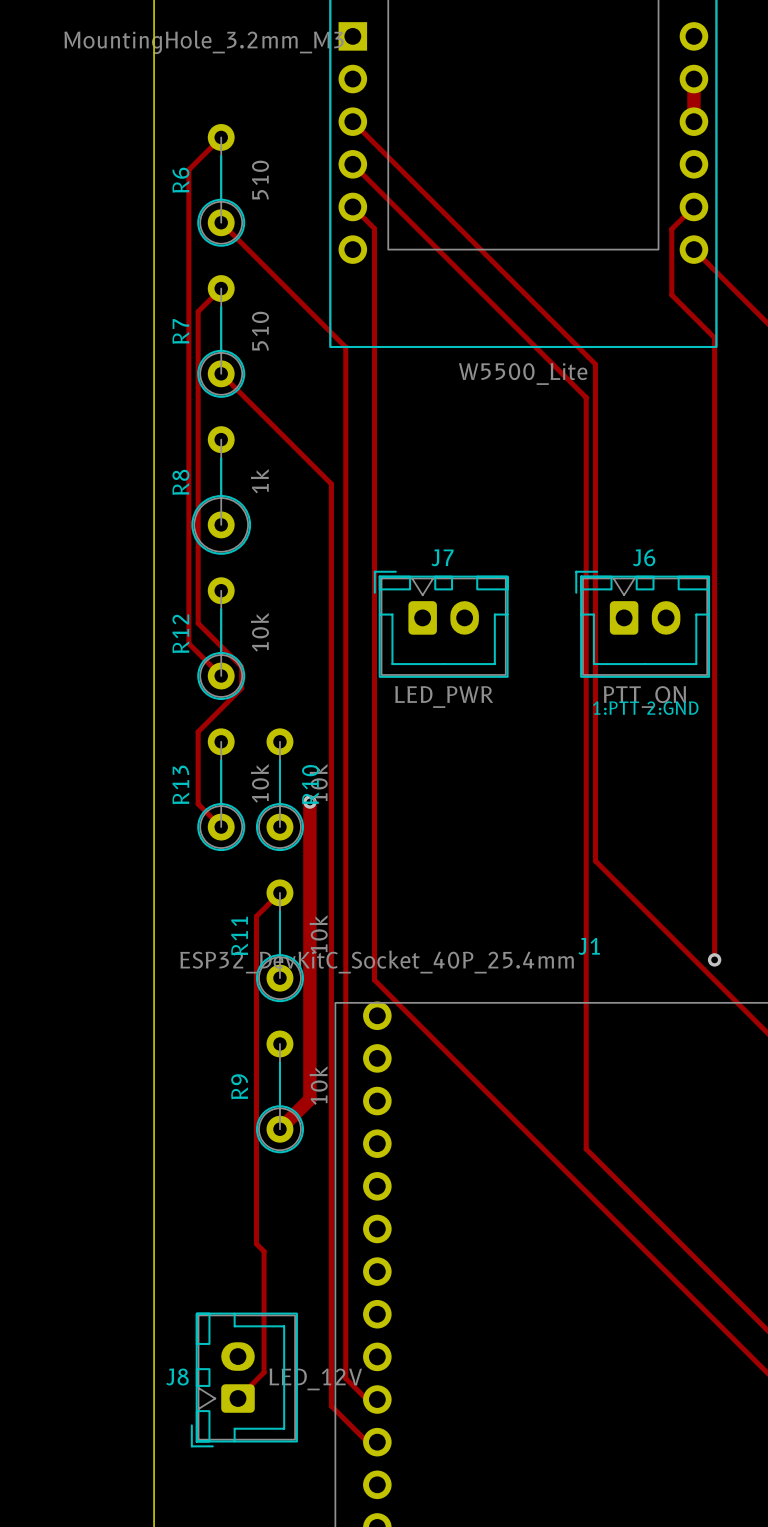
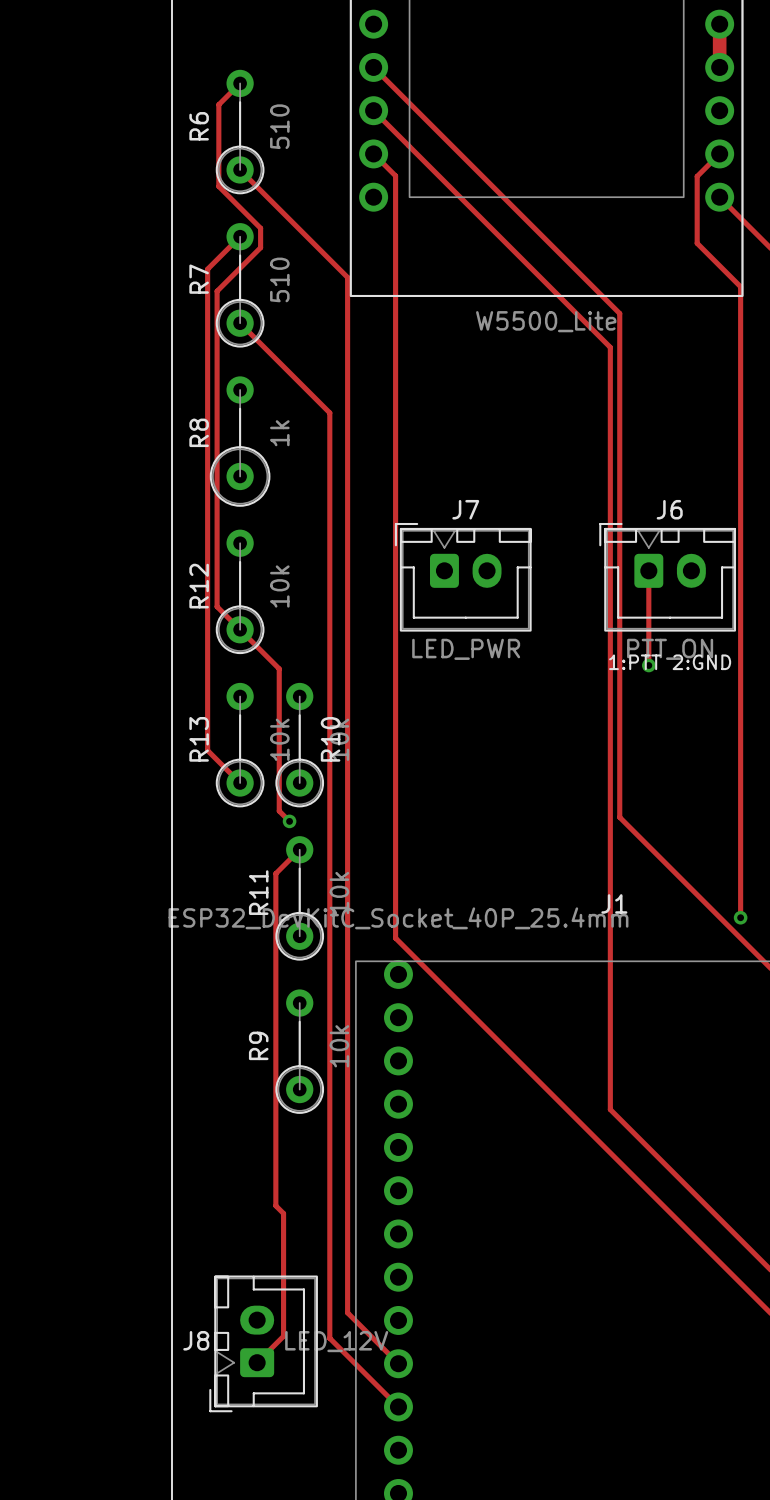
track: (200, 158) (188, 169) (188, 643) (198, 653) -> (218, 104) (218, 186) (260, 228) (260, 247) (217, 291) (217, 606)
track: (198, 311) (198, 623) (241, 666) (241, 688) (198, 731) (198, 804) -> (216, 260) (207, 269) (207, 750) (216, 759)
track: (327, 328) (345, 347) (345, 1378) (366, 1399) (377, 1399) -> (347, 277) (347, 1312) (398, 1363)
track: (309, 462) (331, 483) (331, 1406) (367, 1442) (377, 1442) -> (329, 412) (329, 1338) (398, 1406)
track: none -> (648, 570) (648, 665)
track: none -> (240, 629) (279, 668) (279, 811) (289, 821)
via: none -> (648, 665)
track: (309, 802) (309, 1099) (279, 1129) -> none
via position: (309, 802) -> (289, 821)

